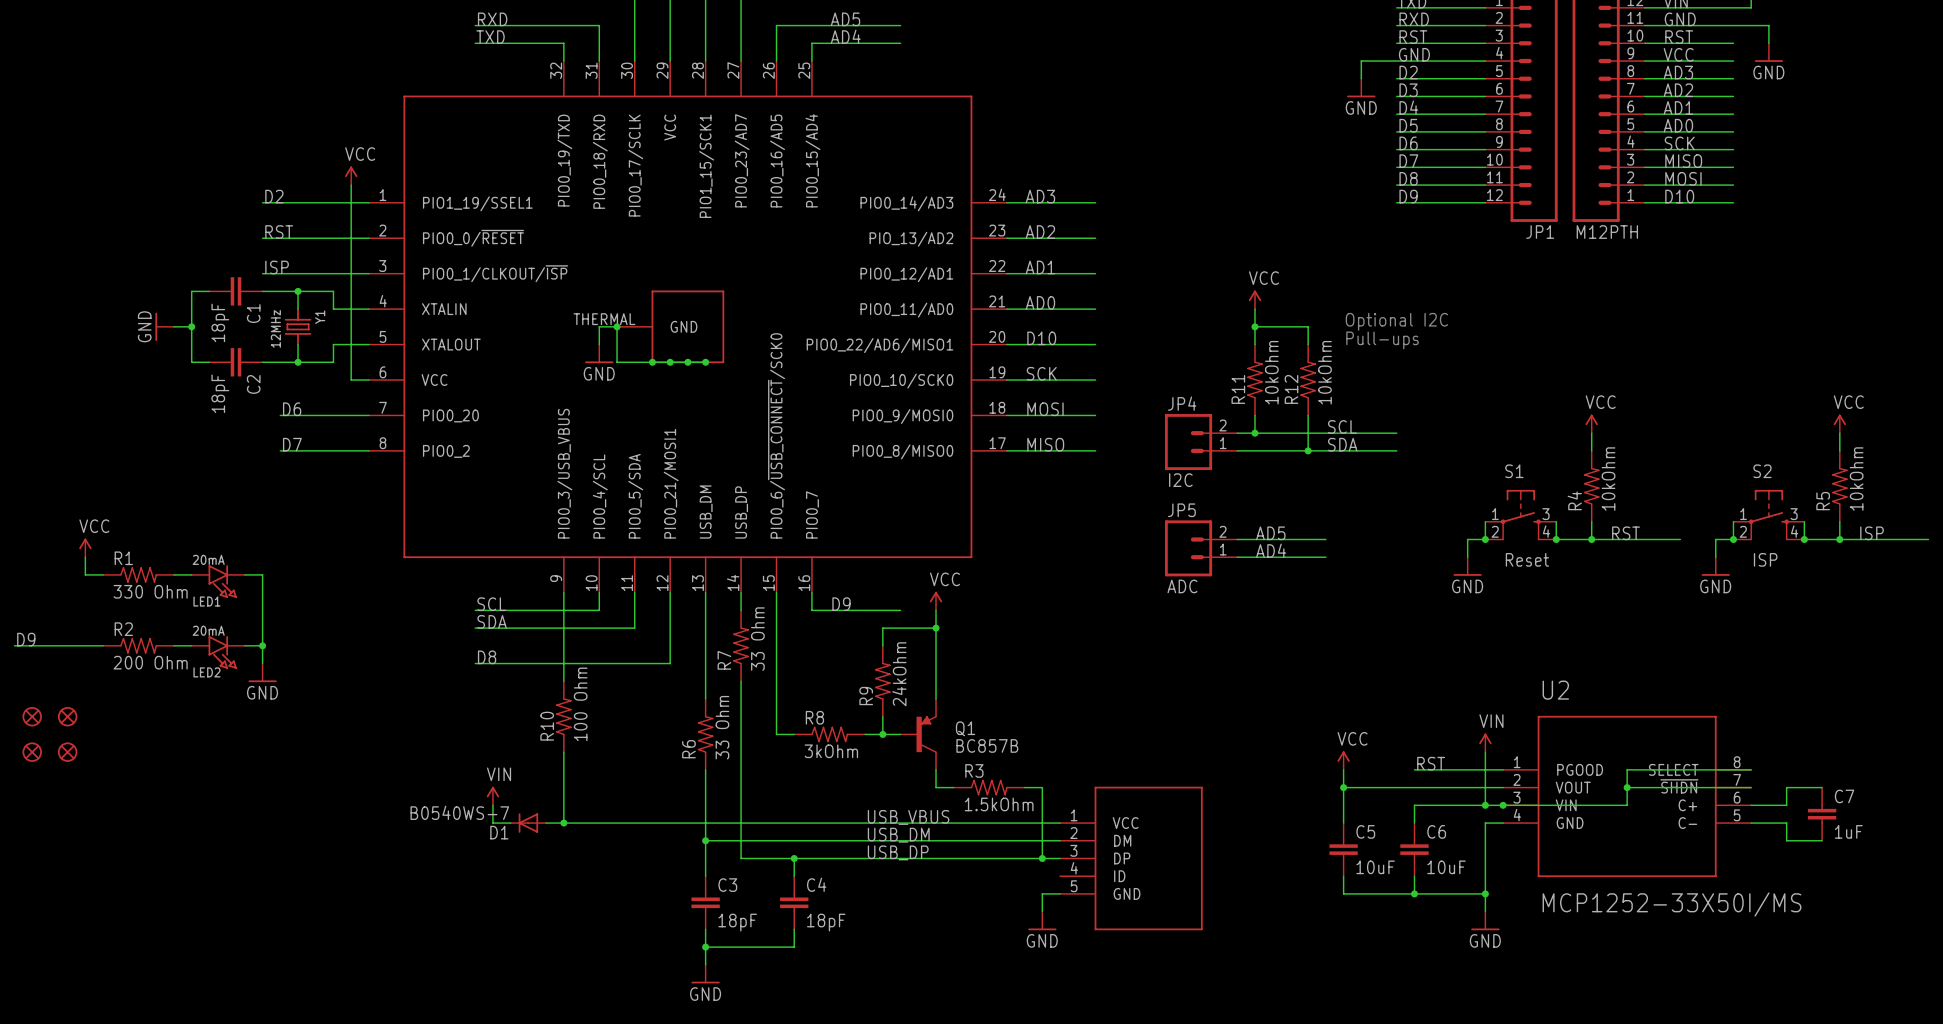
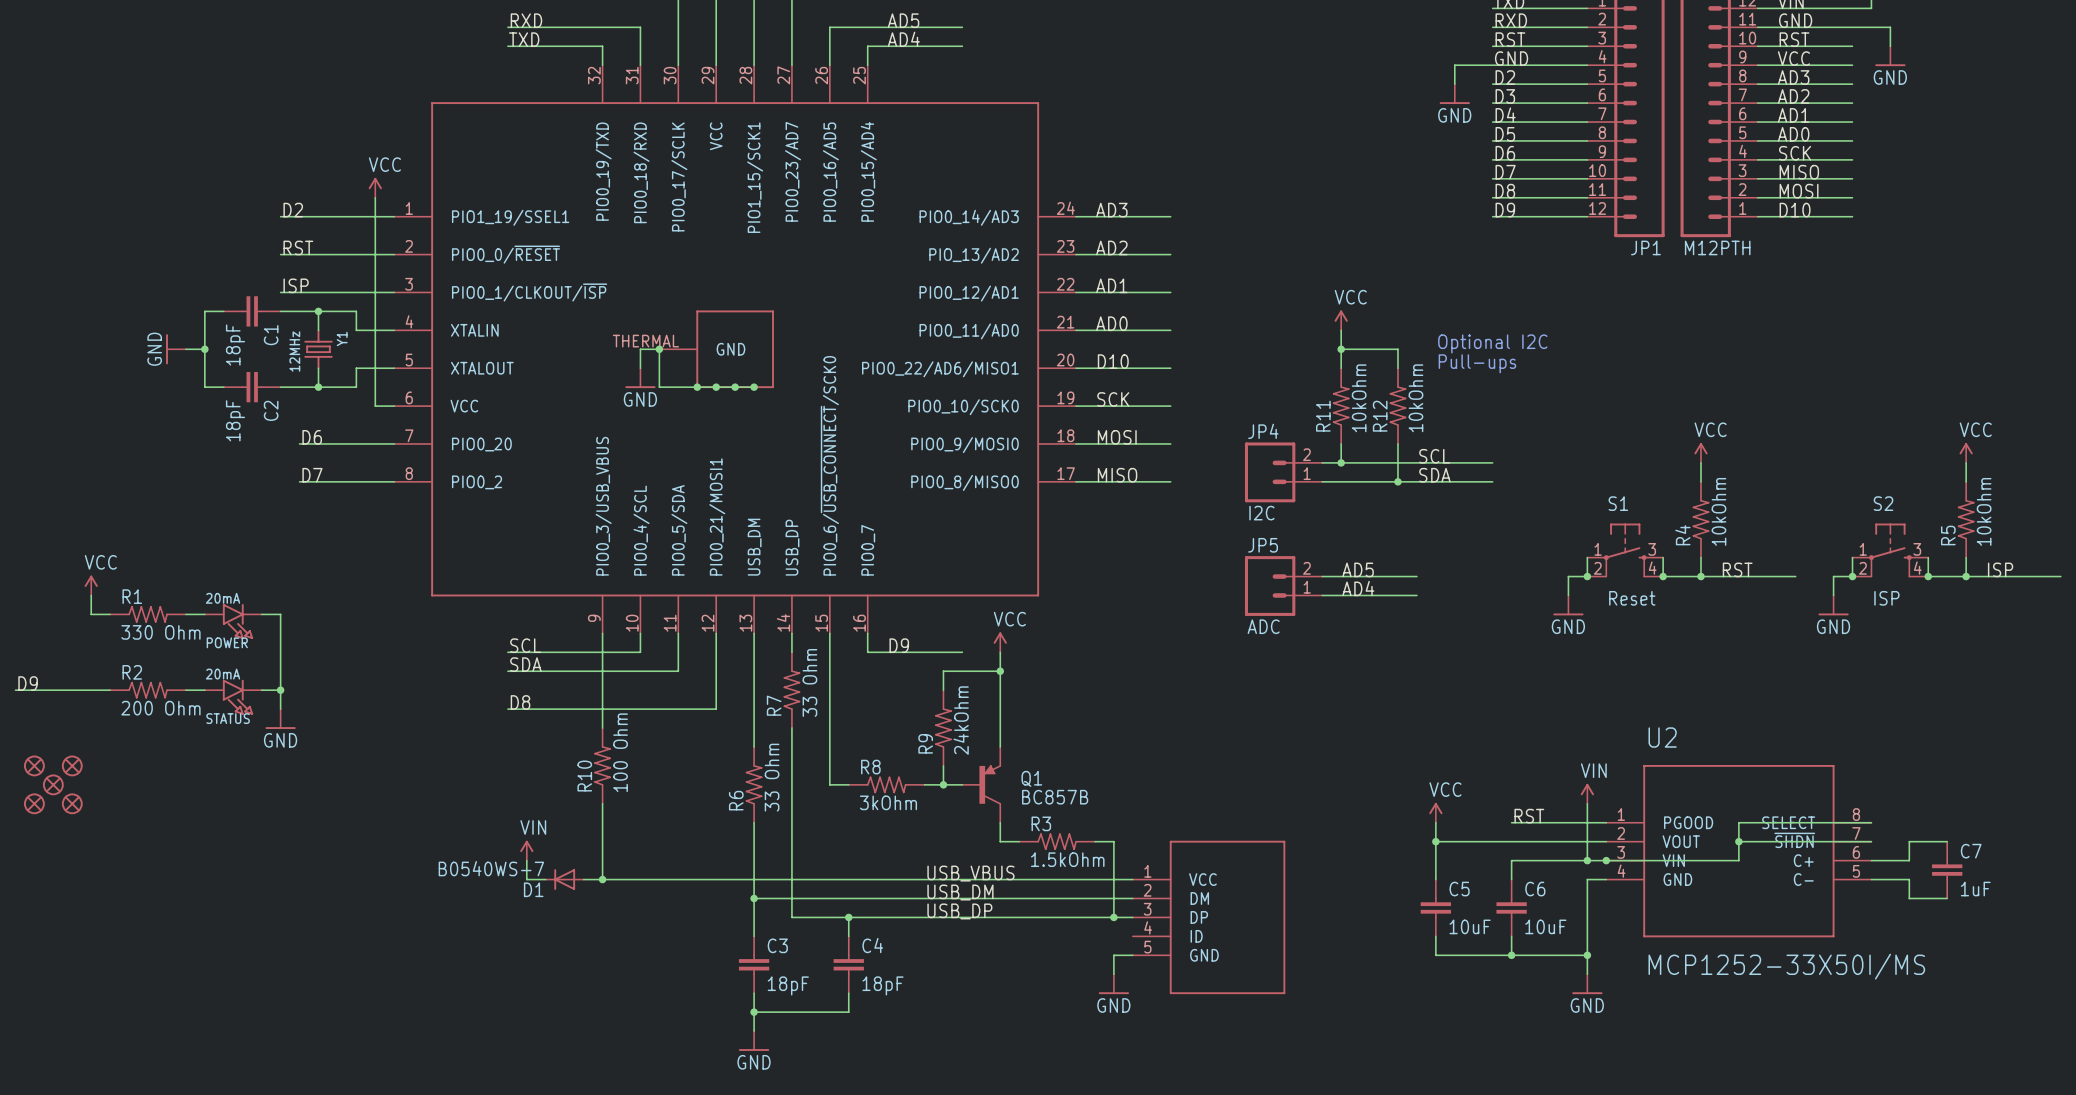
LED1 name: LED1 (206, 601) -> POWER (227, 642)
LED2 name: LED2 (206, 672) -> STATUS (228, 718)
part: none -> (53, 784)

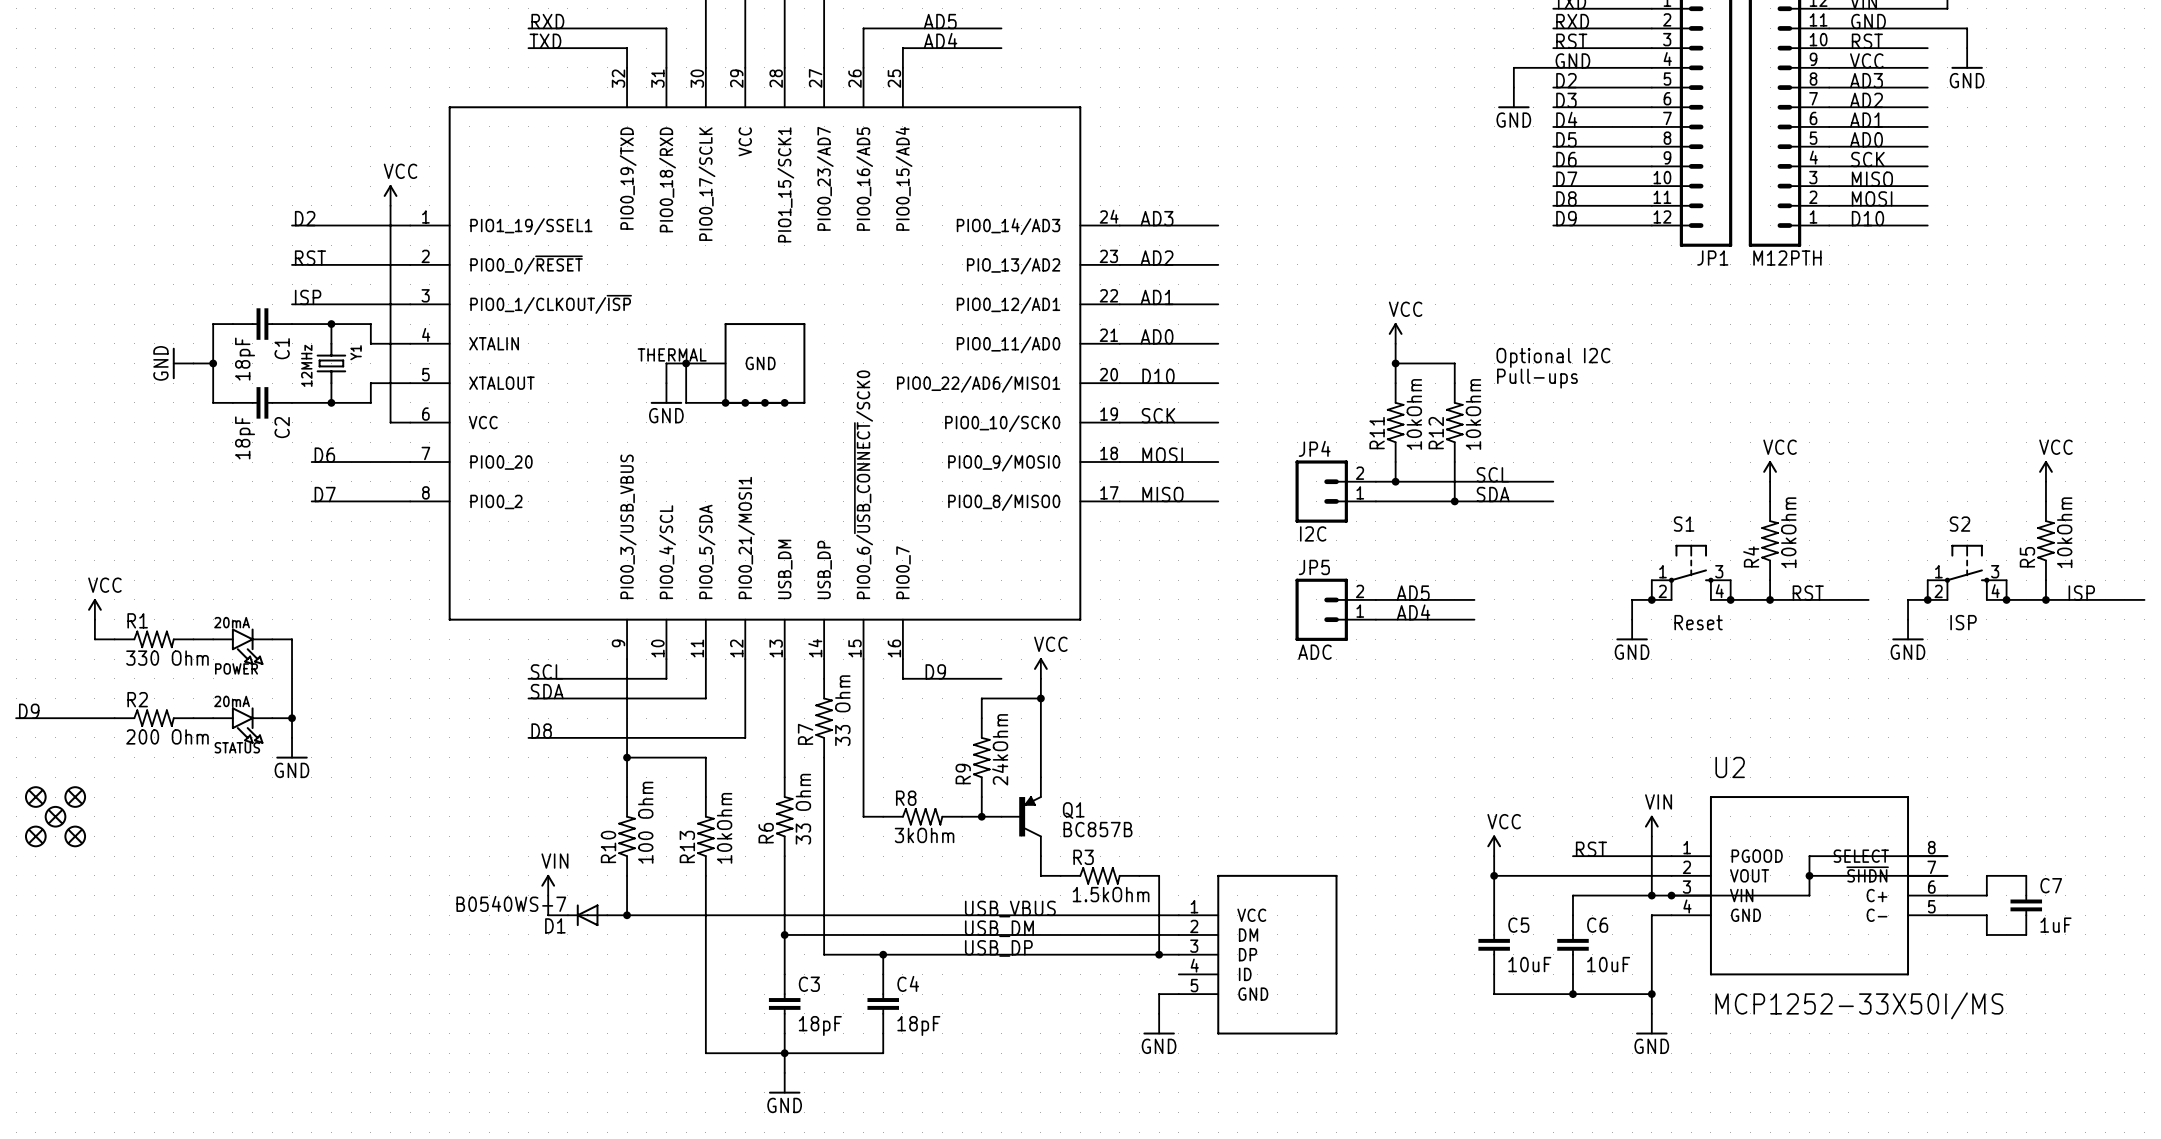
junction: none -> (627, 757)
wire: none -> (627, 797) (627, 757) (705, 757) (705, 797)
R10 position: (602, 765) -> (627, 836)
R13: none -> 10kOhm (705, 836)
wire: none -> (705, 875) (705, 1053) (784, 1053)

